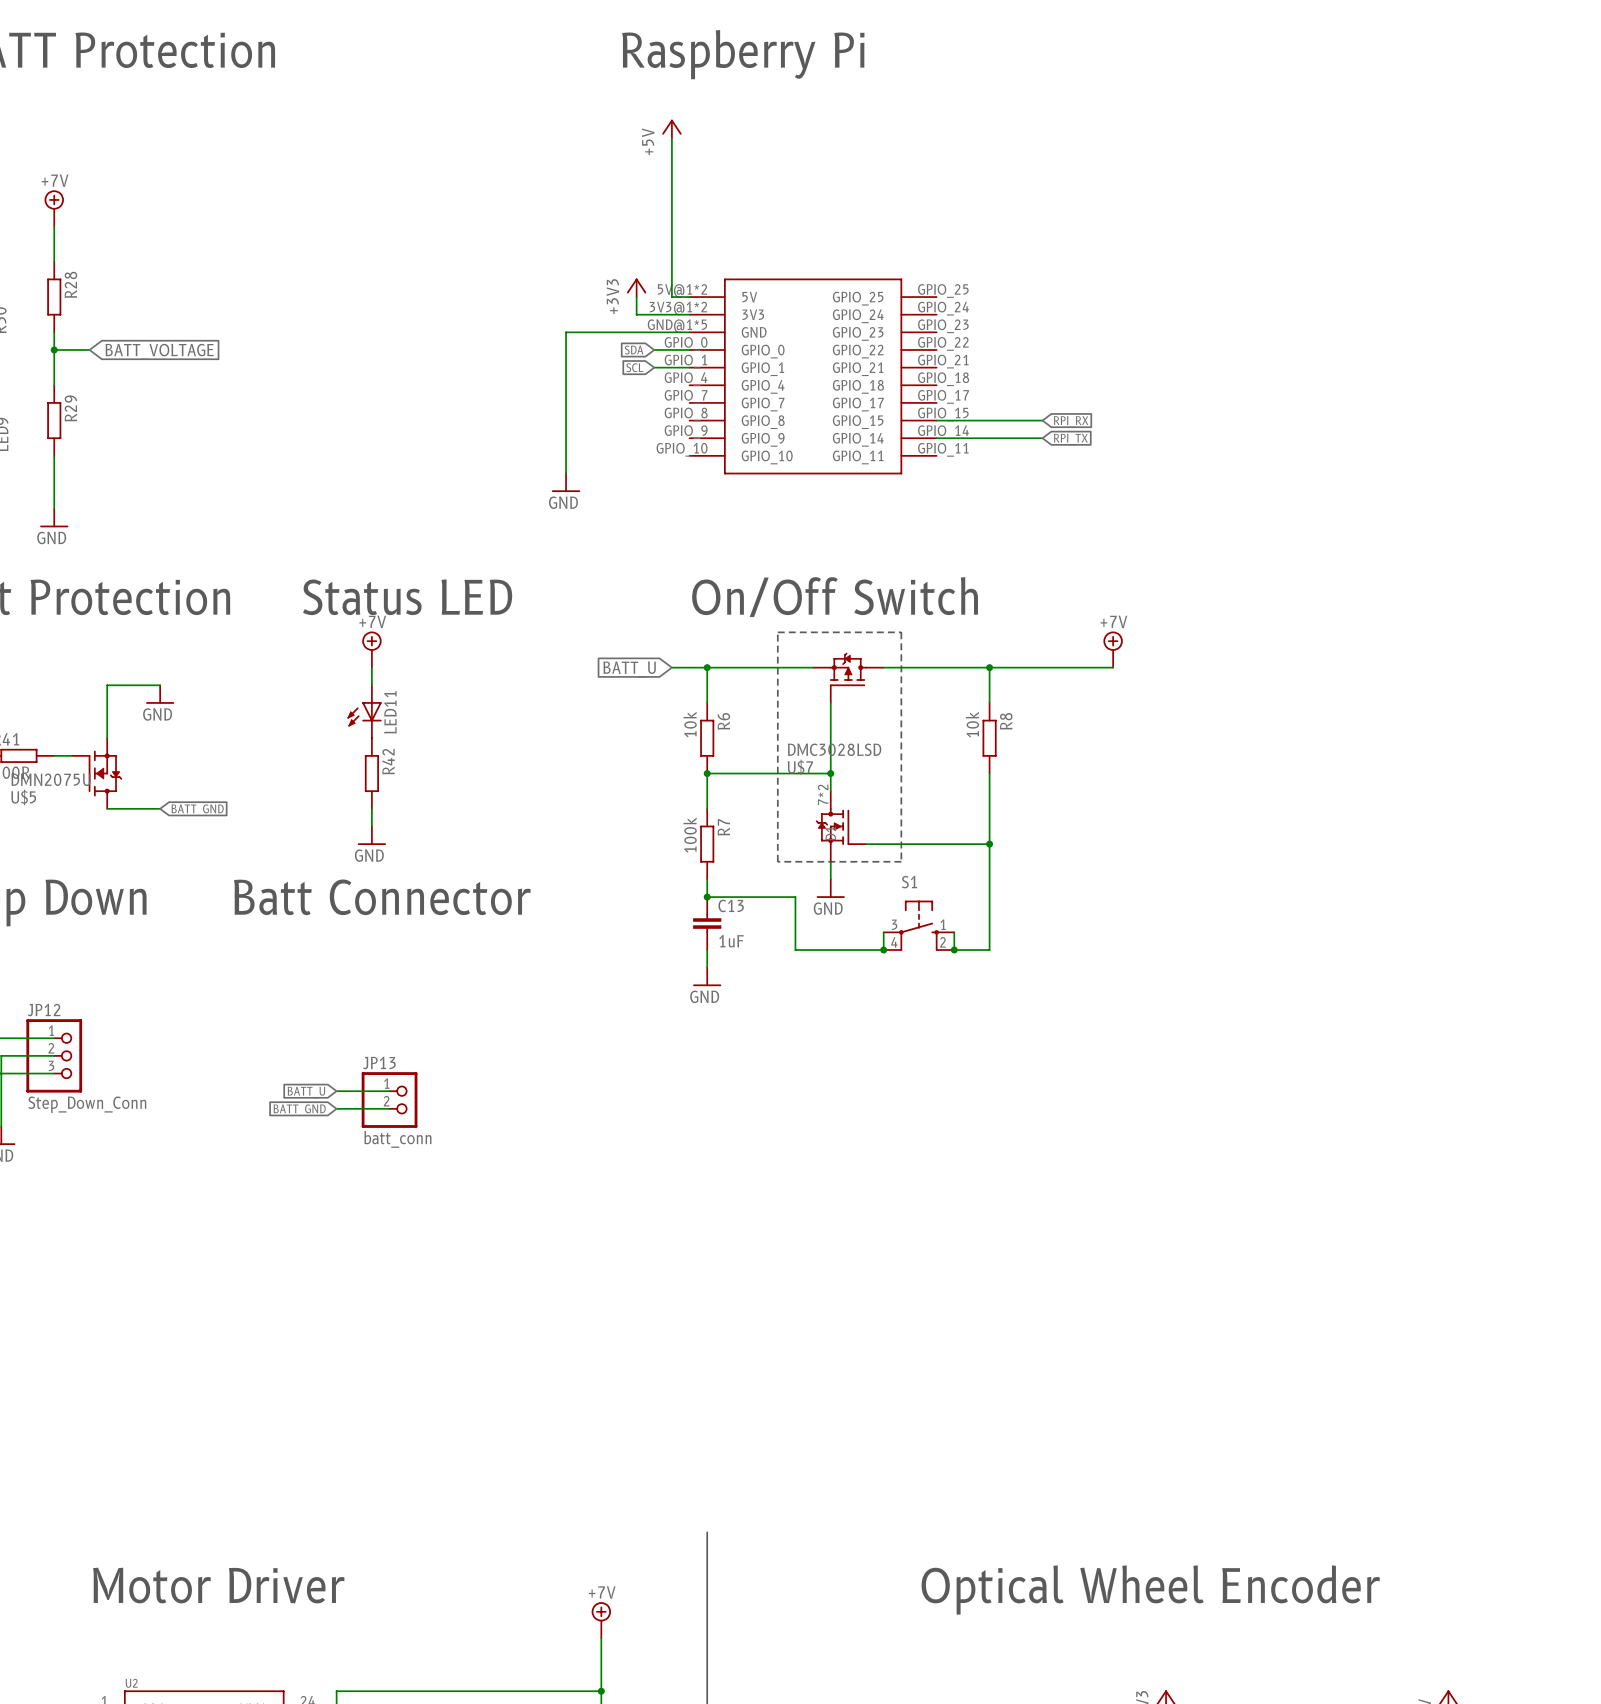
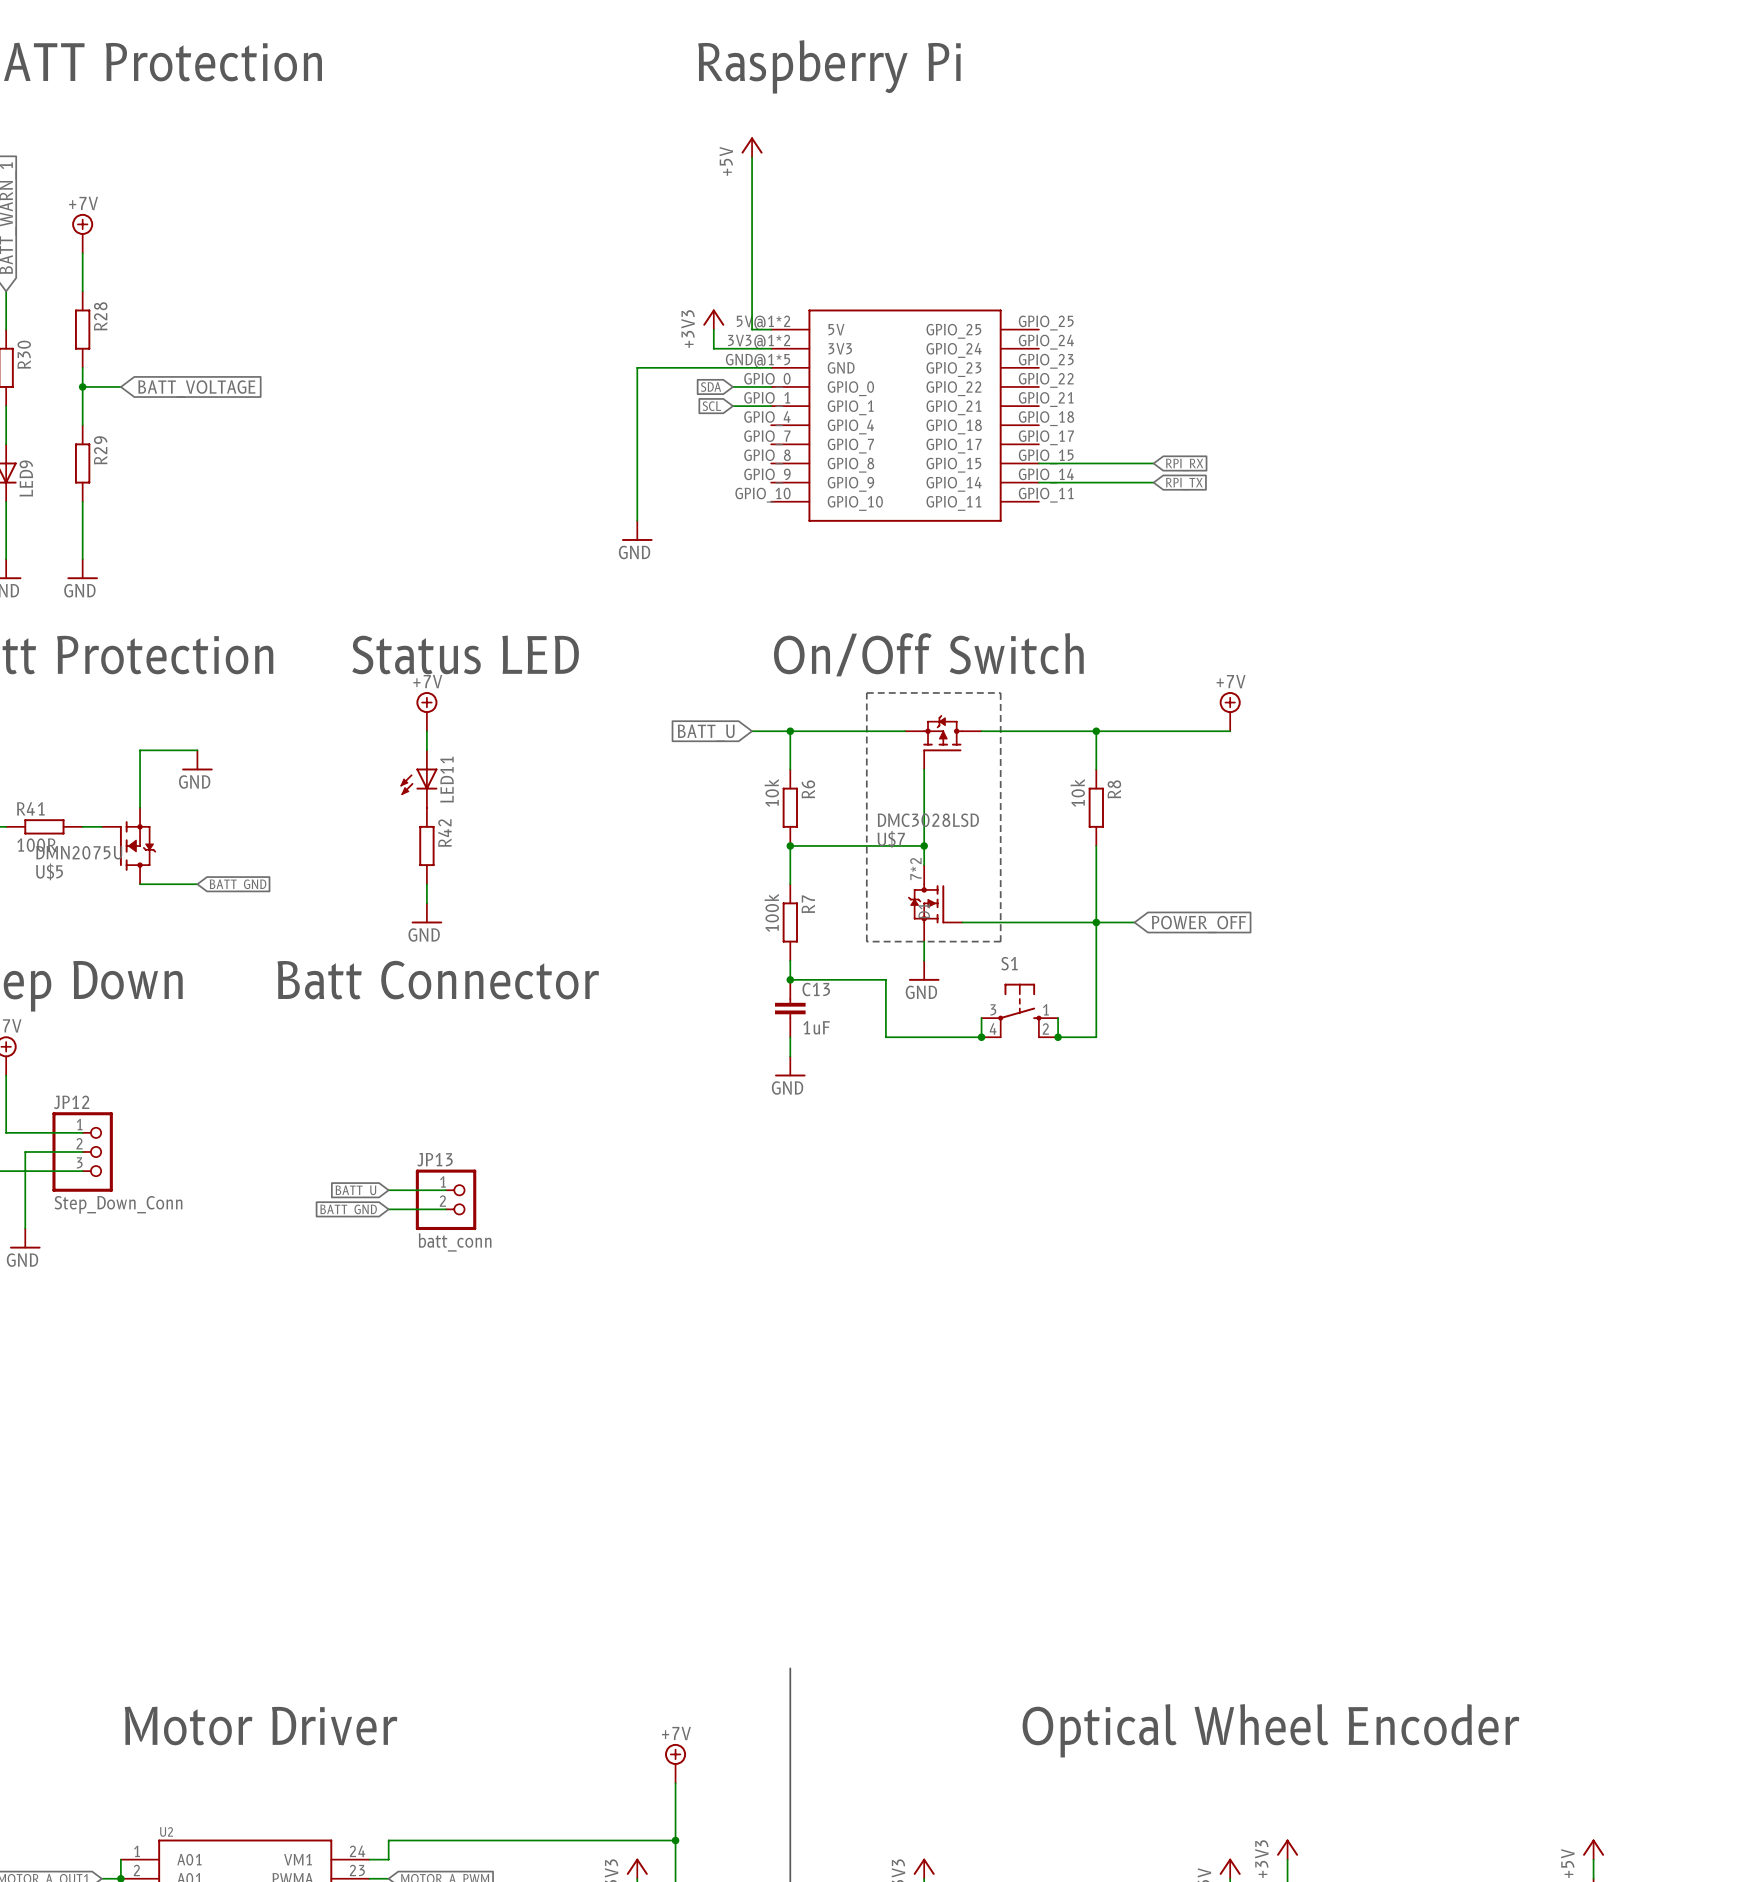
wire: none -> (1096, 922) (1134, 922)
global label: none -> POWER_OFF (1198, 924)

